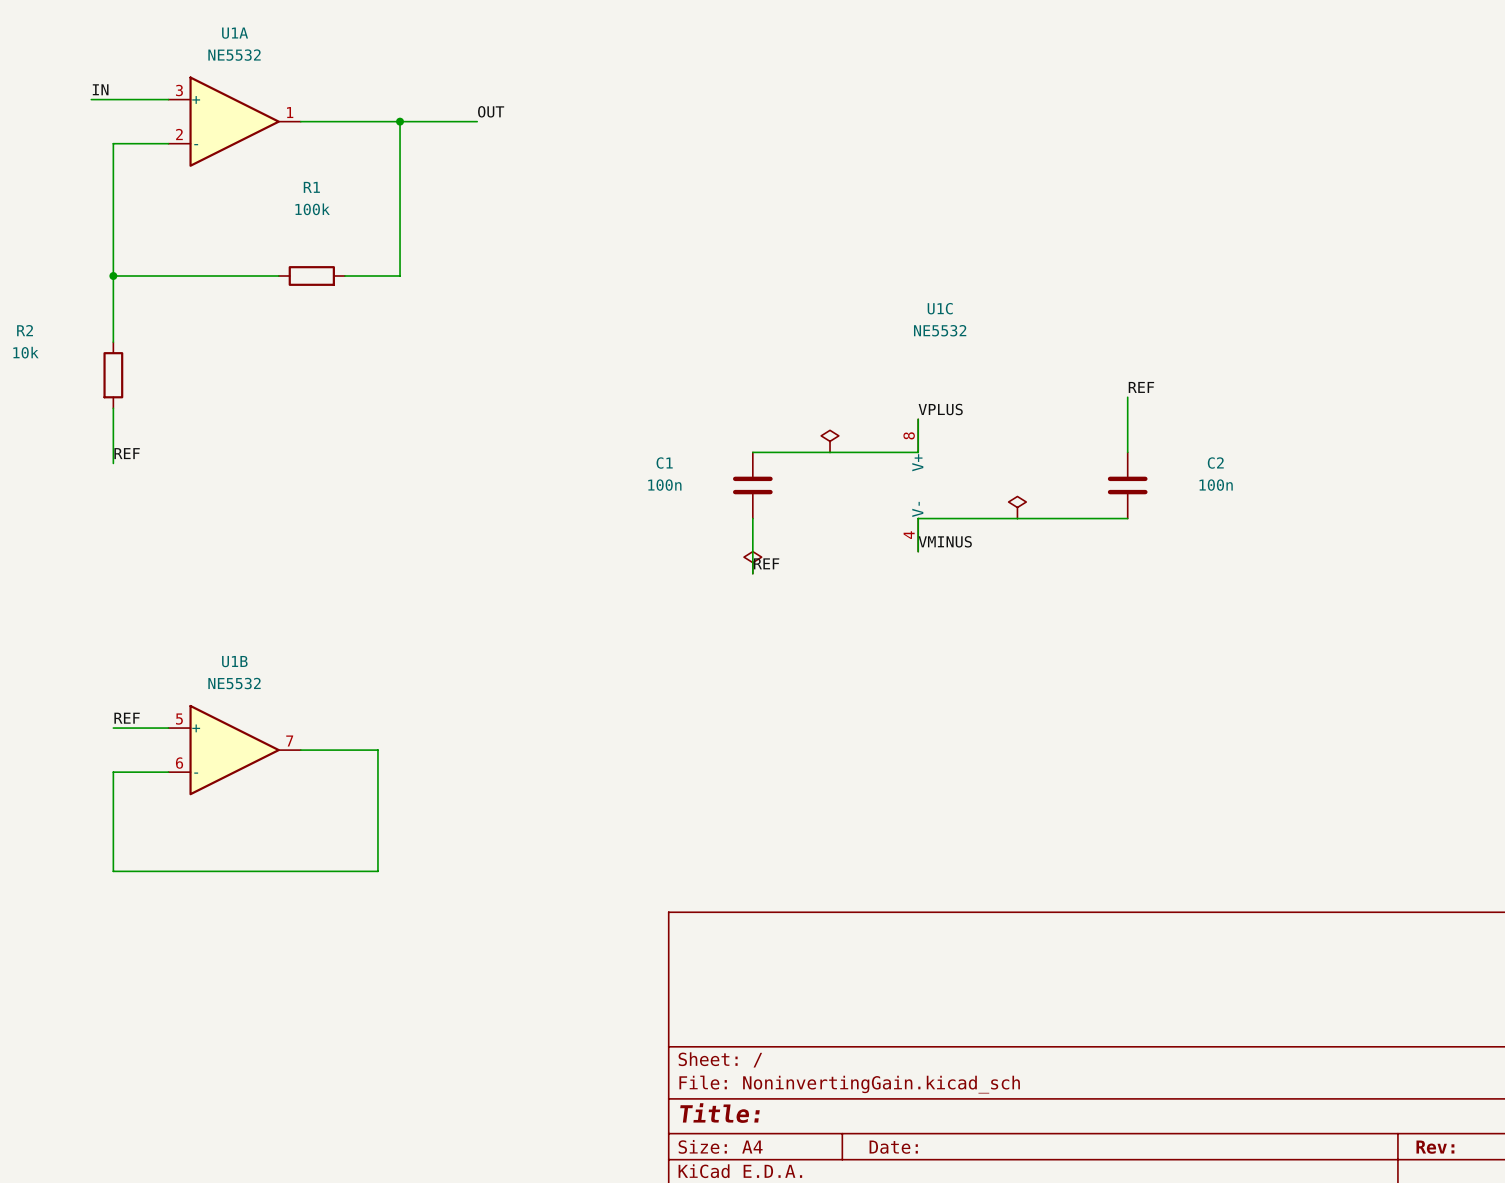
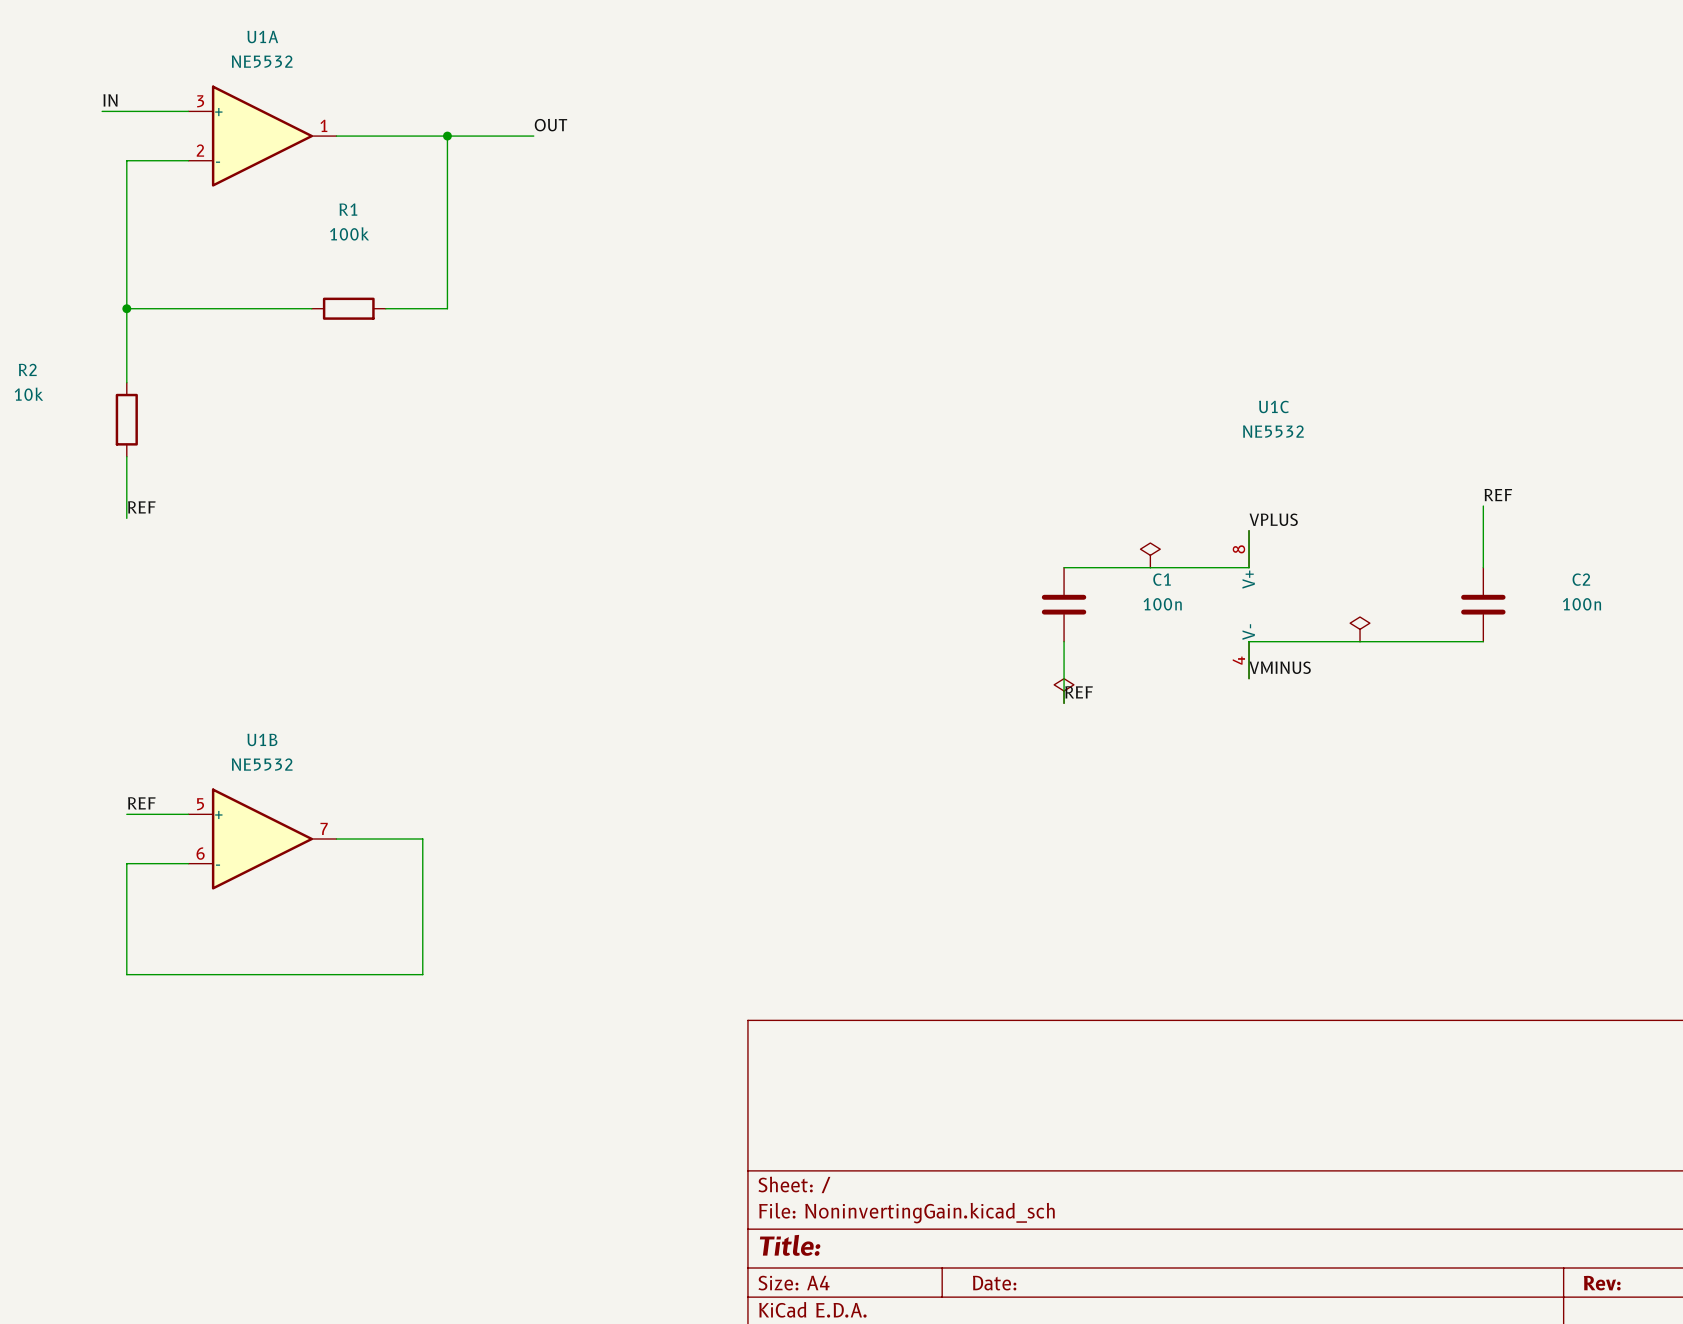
label: REF (1141, 387) -> none
wire: (1127, 397) (1127, 452) -> (1483, 506) (1483, 567)
label position: VPLUS (940, 409) -> VPLUS (1273, 519)
wire: (918, 419) (918, 452) (752, 452) -> (1249, 530) (1249, 567) (1064, 567)
power symbol: (830, 441) -> none
label: none -> REF (1498, 495)
C1 name position: C1 (664, 463) -> C1 (1162, 579)
C1 value position: 100n (664, 485) -> 100n (1162, 604)
C1 position: (752, 485) -> (1064, 604)
U1C position: (918, 485) -> (1249, 604)
C2 position: (1127, 485) -> (1483, 604)
power symbol position: (1017, 507) -> (1150, 555)
wire: (752, 518) (752, 573) -> (1064, 641) (1064, 703)
wire: (1127, 518) (918, 518) (918, 551) -> (1483, 641) (1249, 641) (1249, 678)
label position: VMINUS (945, 541) -> VMINUS (1280, 667)
power symbol: (752, 562) -> none
power symbol: none -> (1360, 629)
label: REF (766, 563) -> none
power symbol: none -> (1064, 691)
label: none -> REF (1079, 692)

